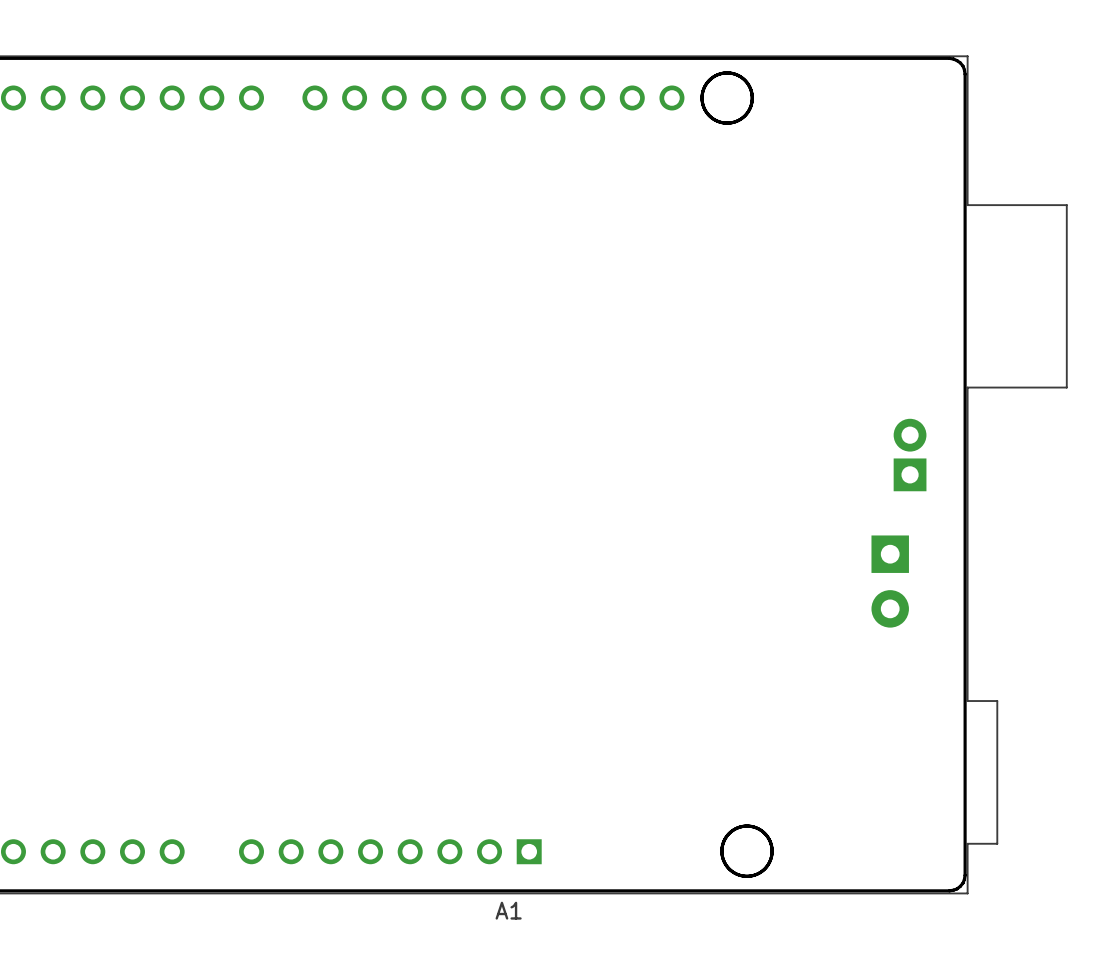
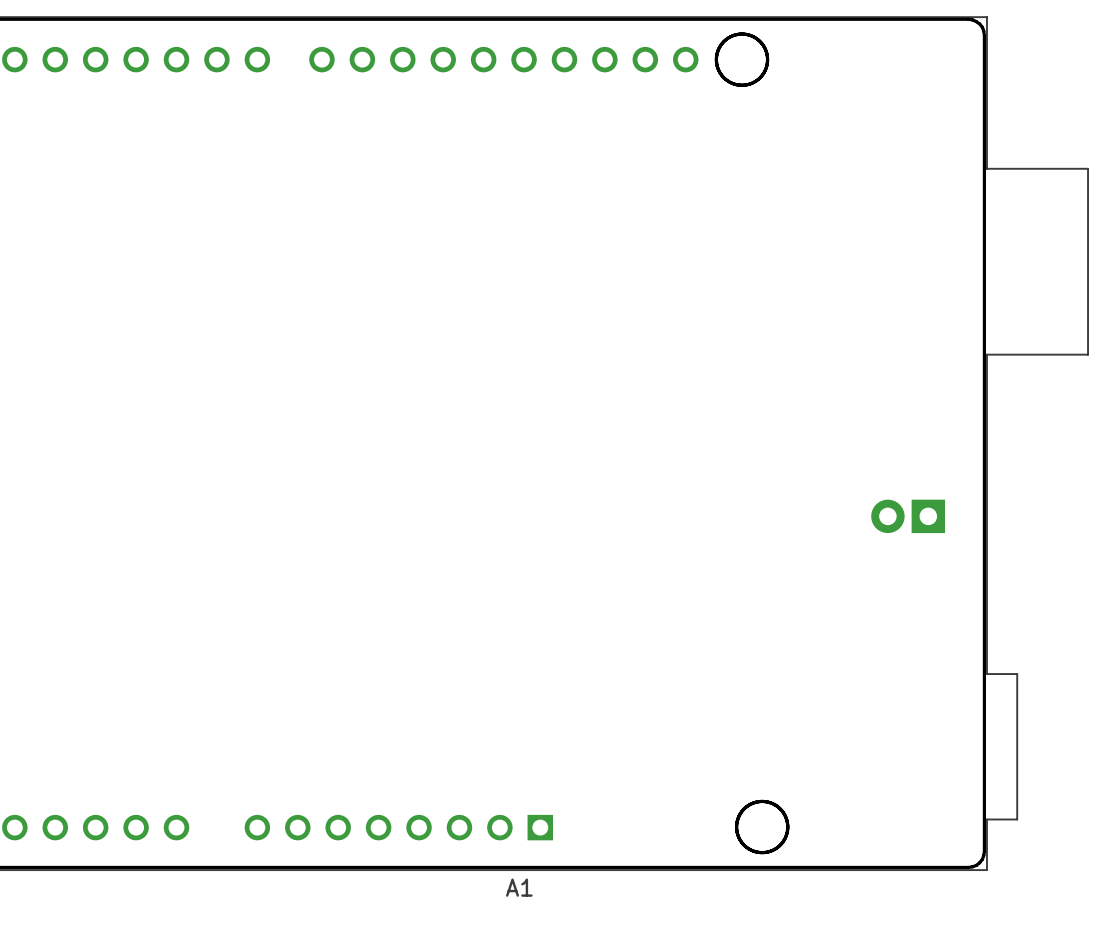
part rotation: 0° (910, 455) -> 90° counterclockwise (908, 516)
part position: (910, 455) -> (908, 516)
part: (890, 581) -> none

